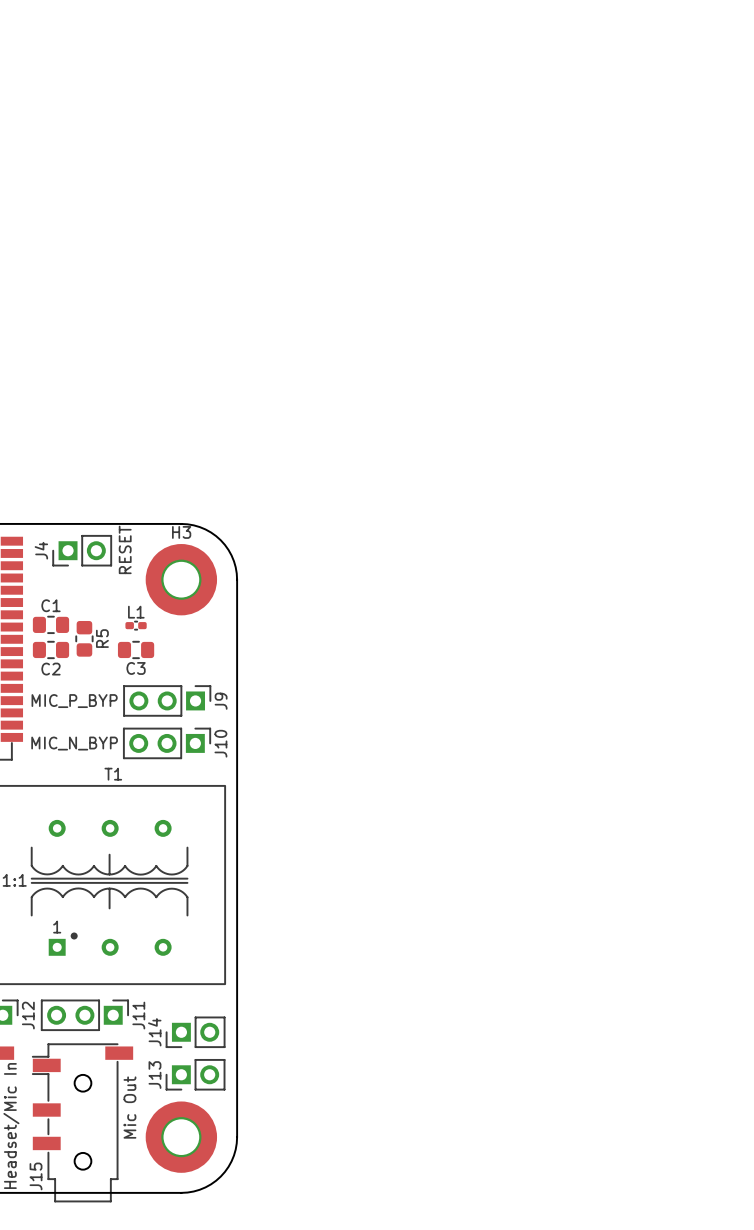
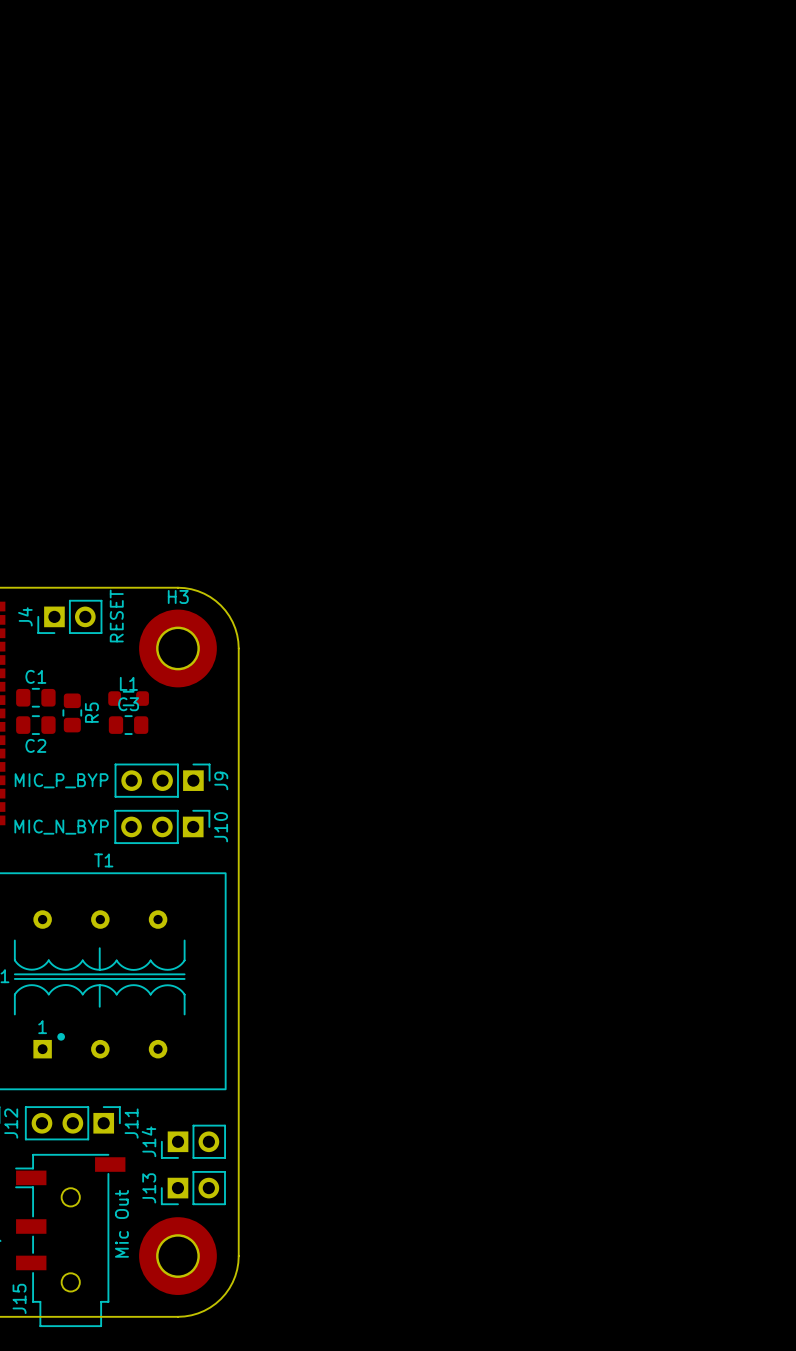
L1 footprint: [125, 620, 147, 631] -> [108, 691, 149, 707]
C3 name position: C3 (136, 668) -> C3 (128, 704)

